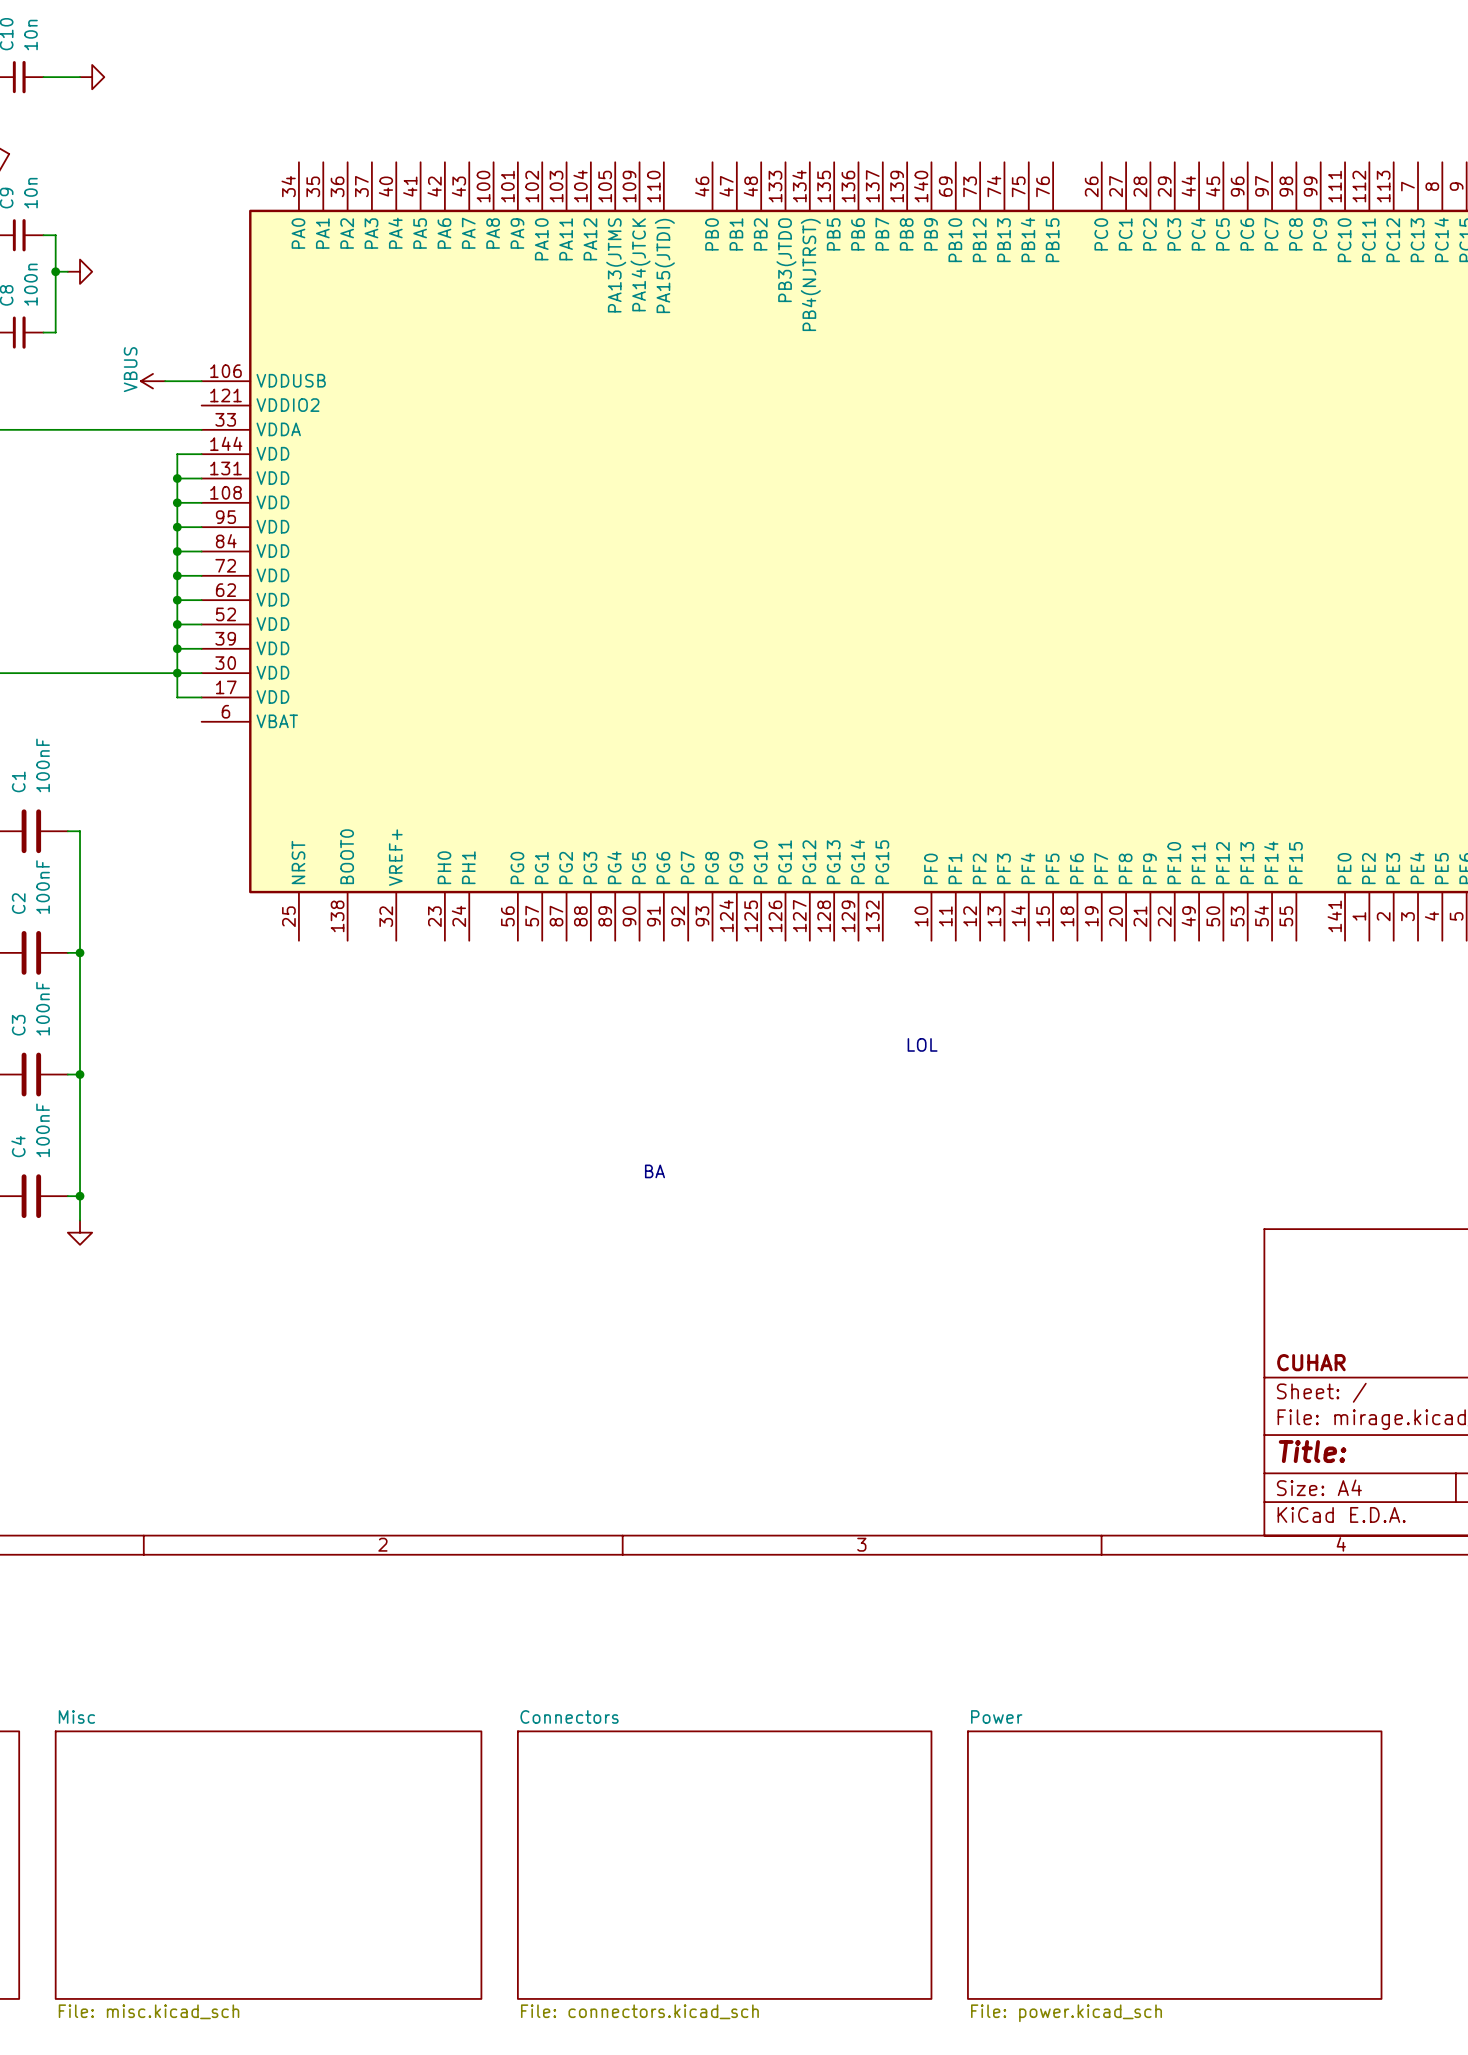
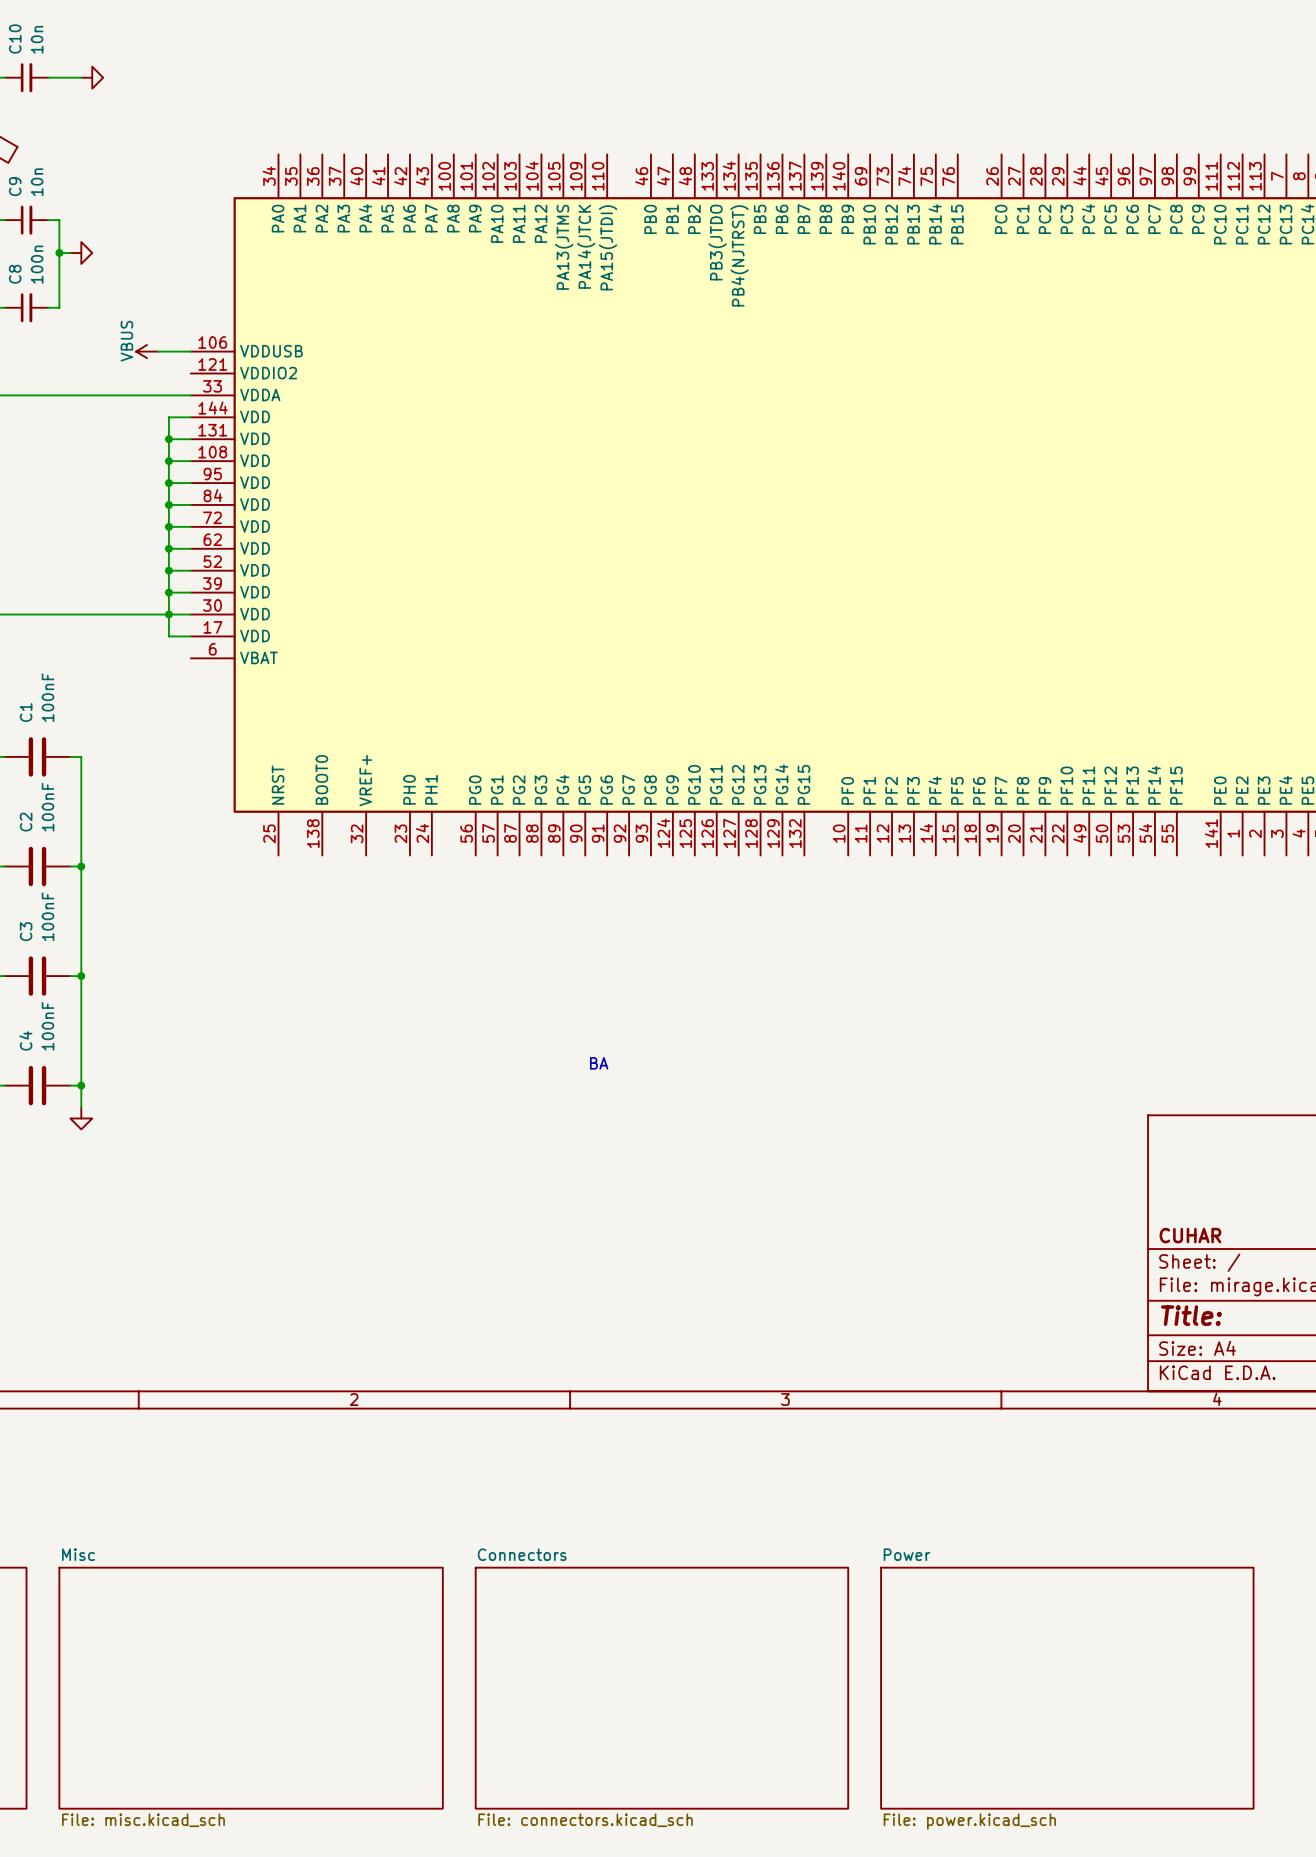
text: LOL (922, 1044) -> none

